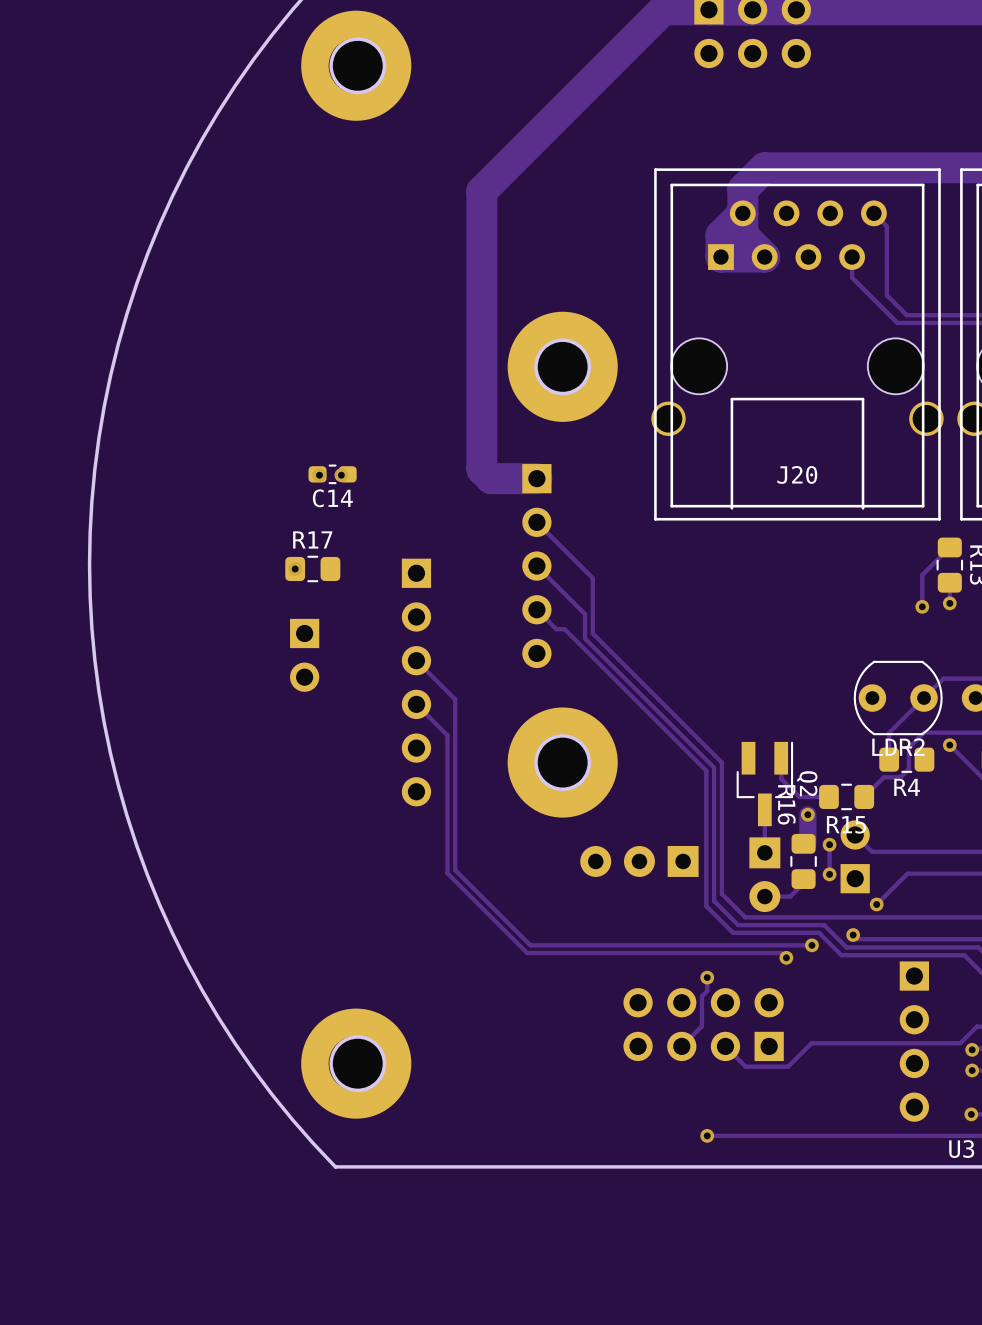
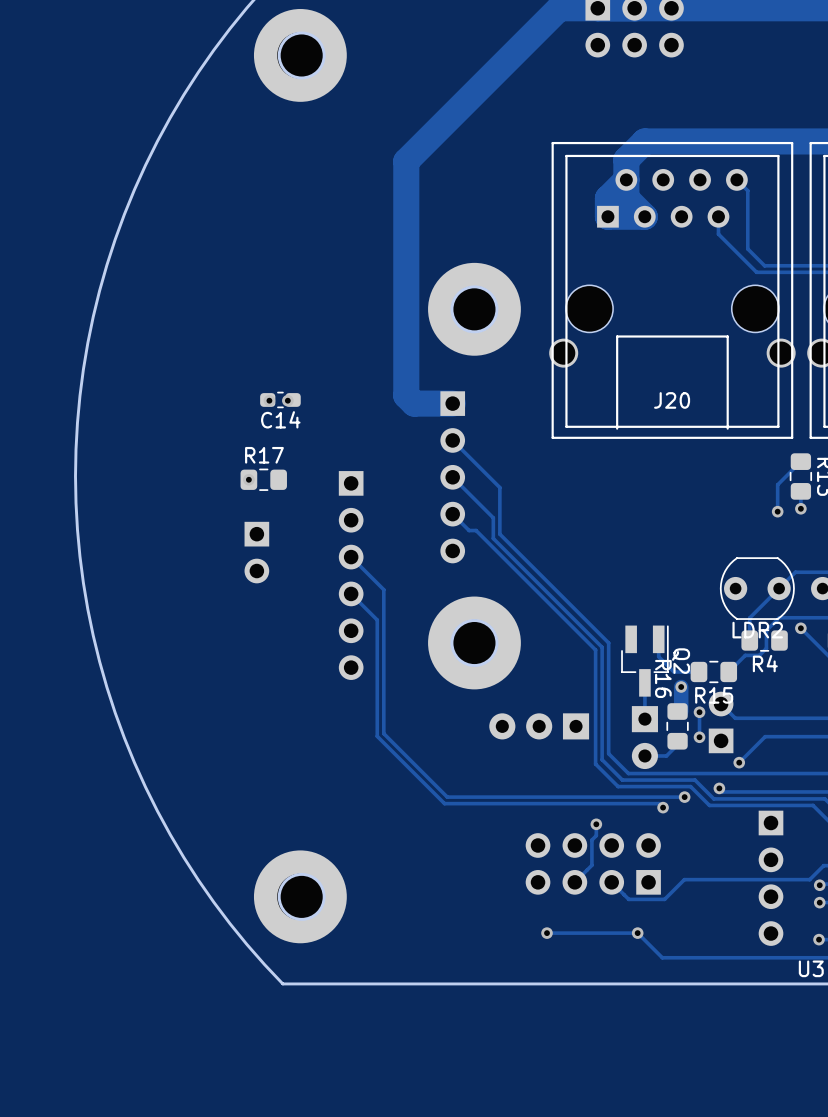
via: none -> (547, 933)
via: none -> (637, 933)
via: (707, 1135) -> none
track: (785, 1135) (707, 1135) -> (662, 957) (637, 933) (547, 933)

